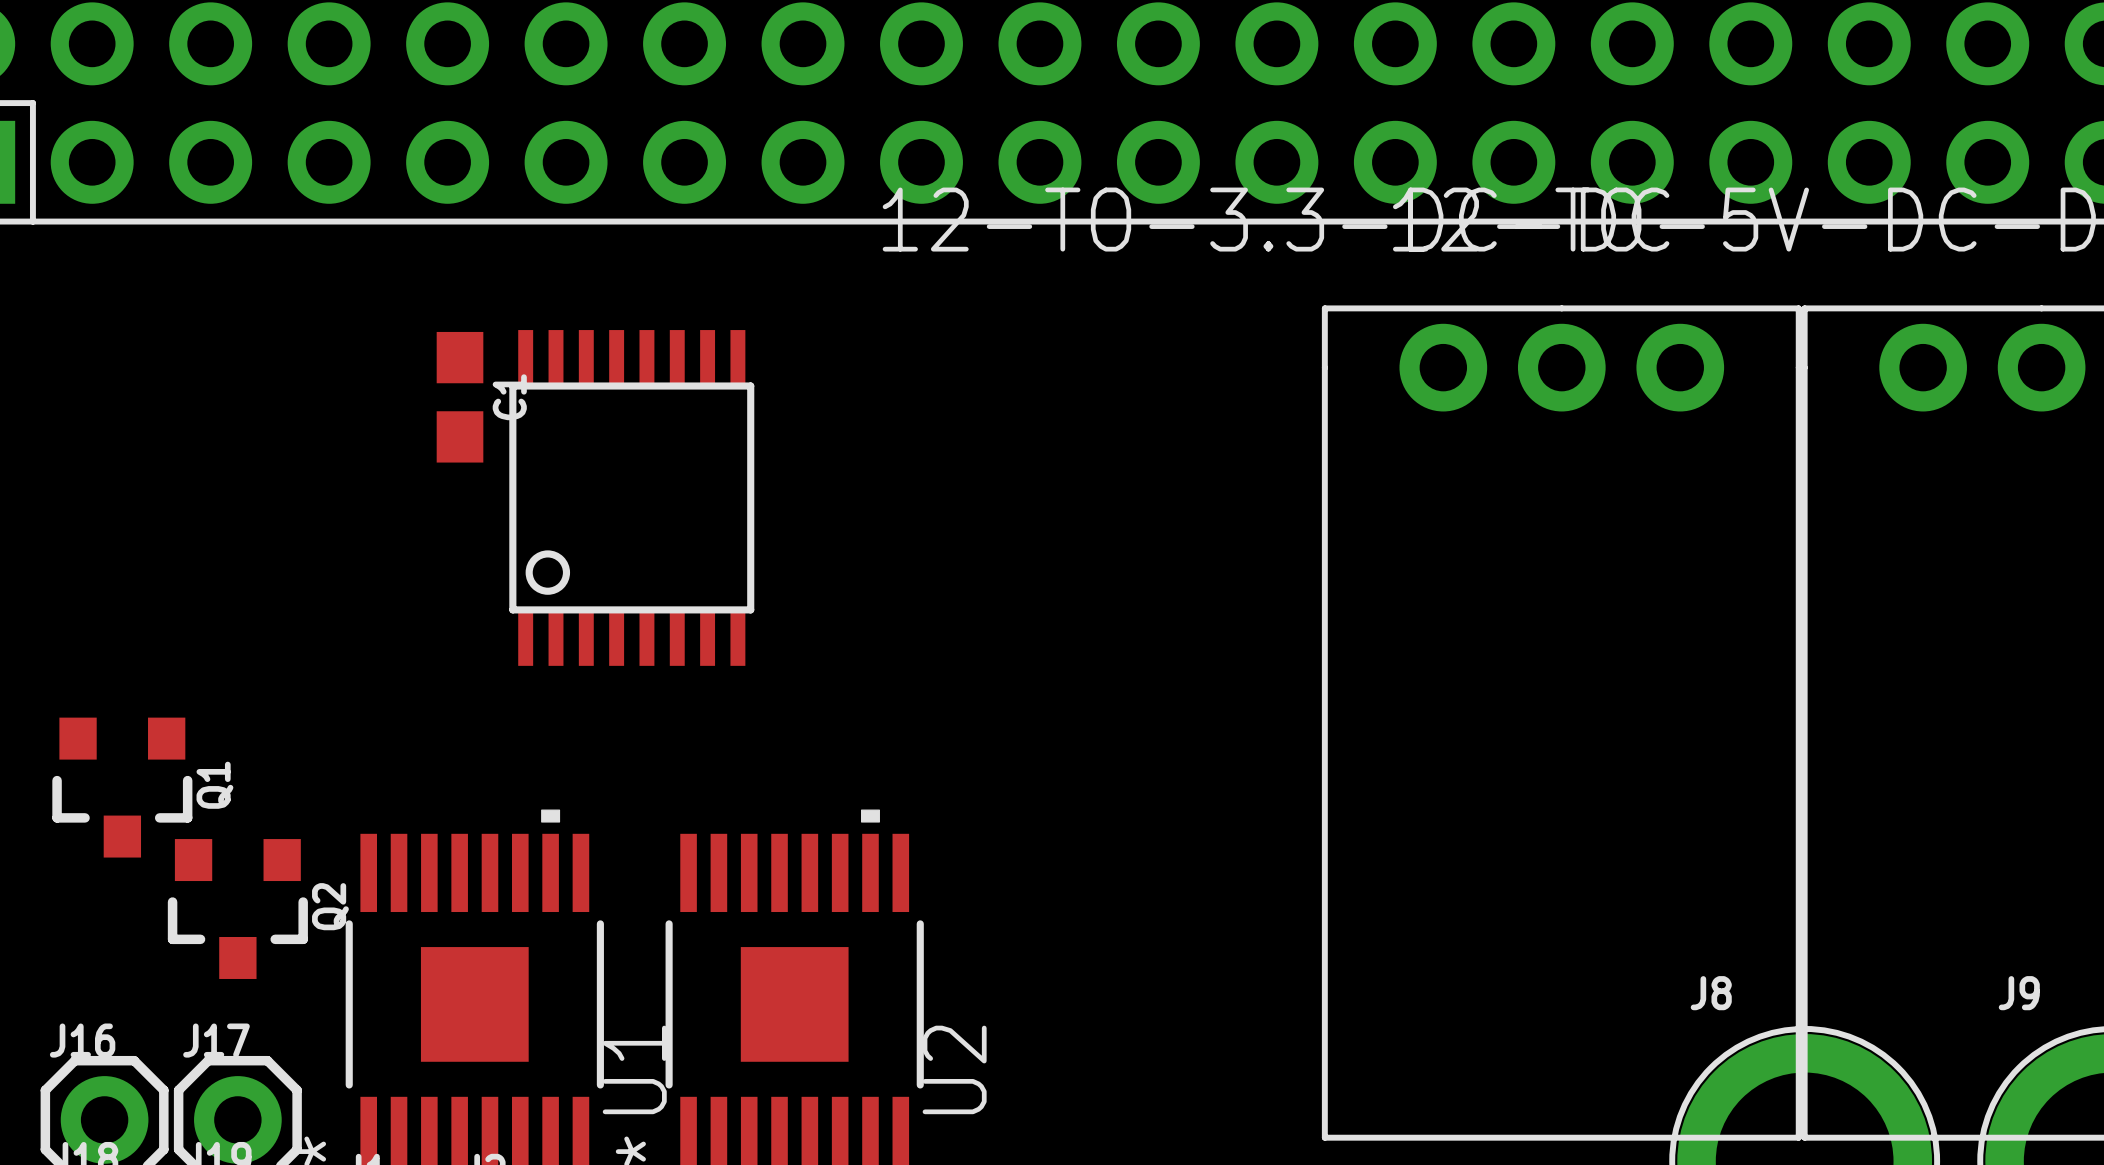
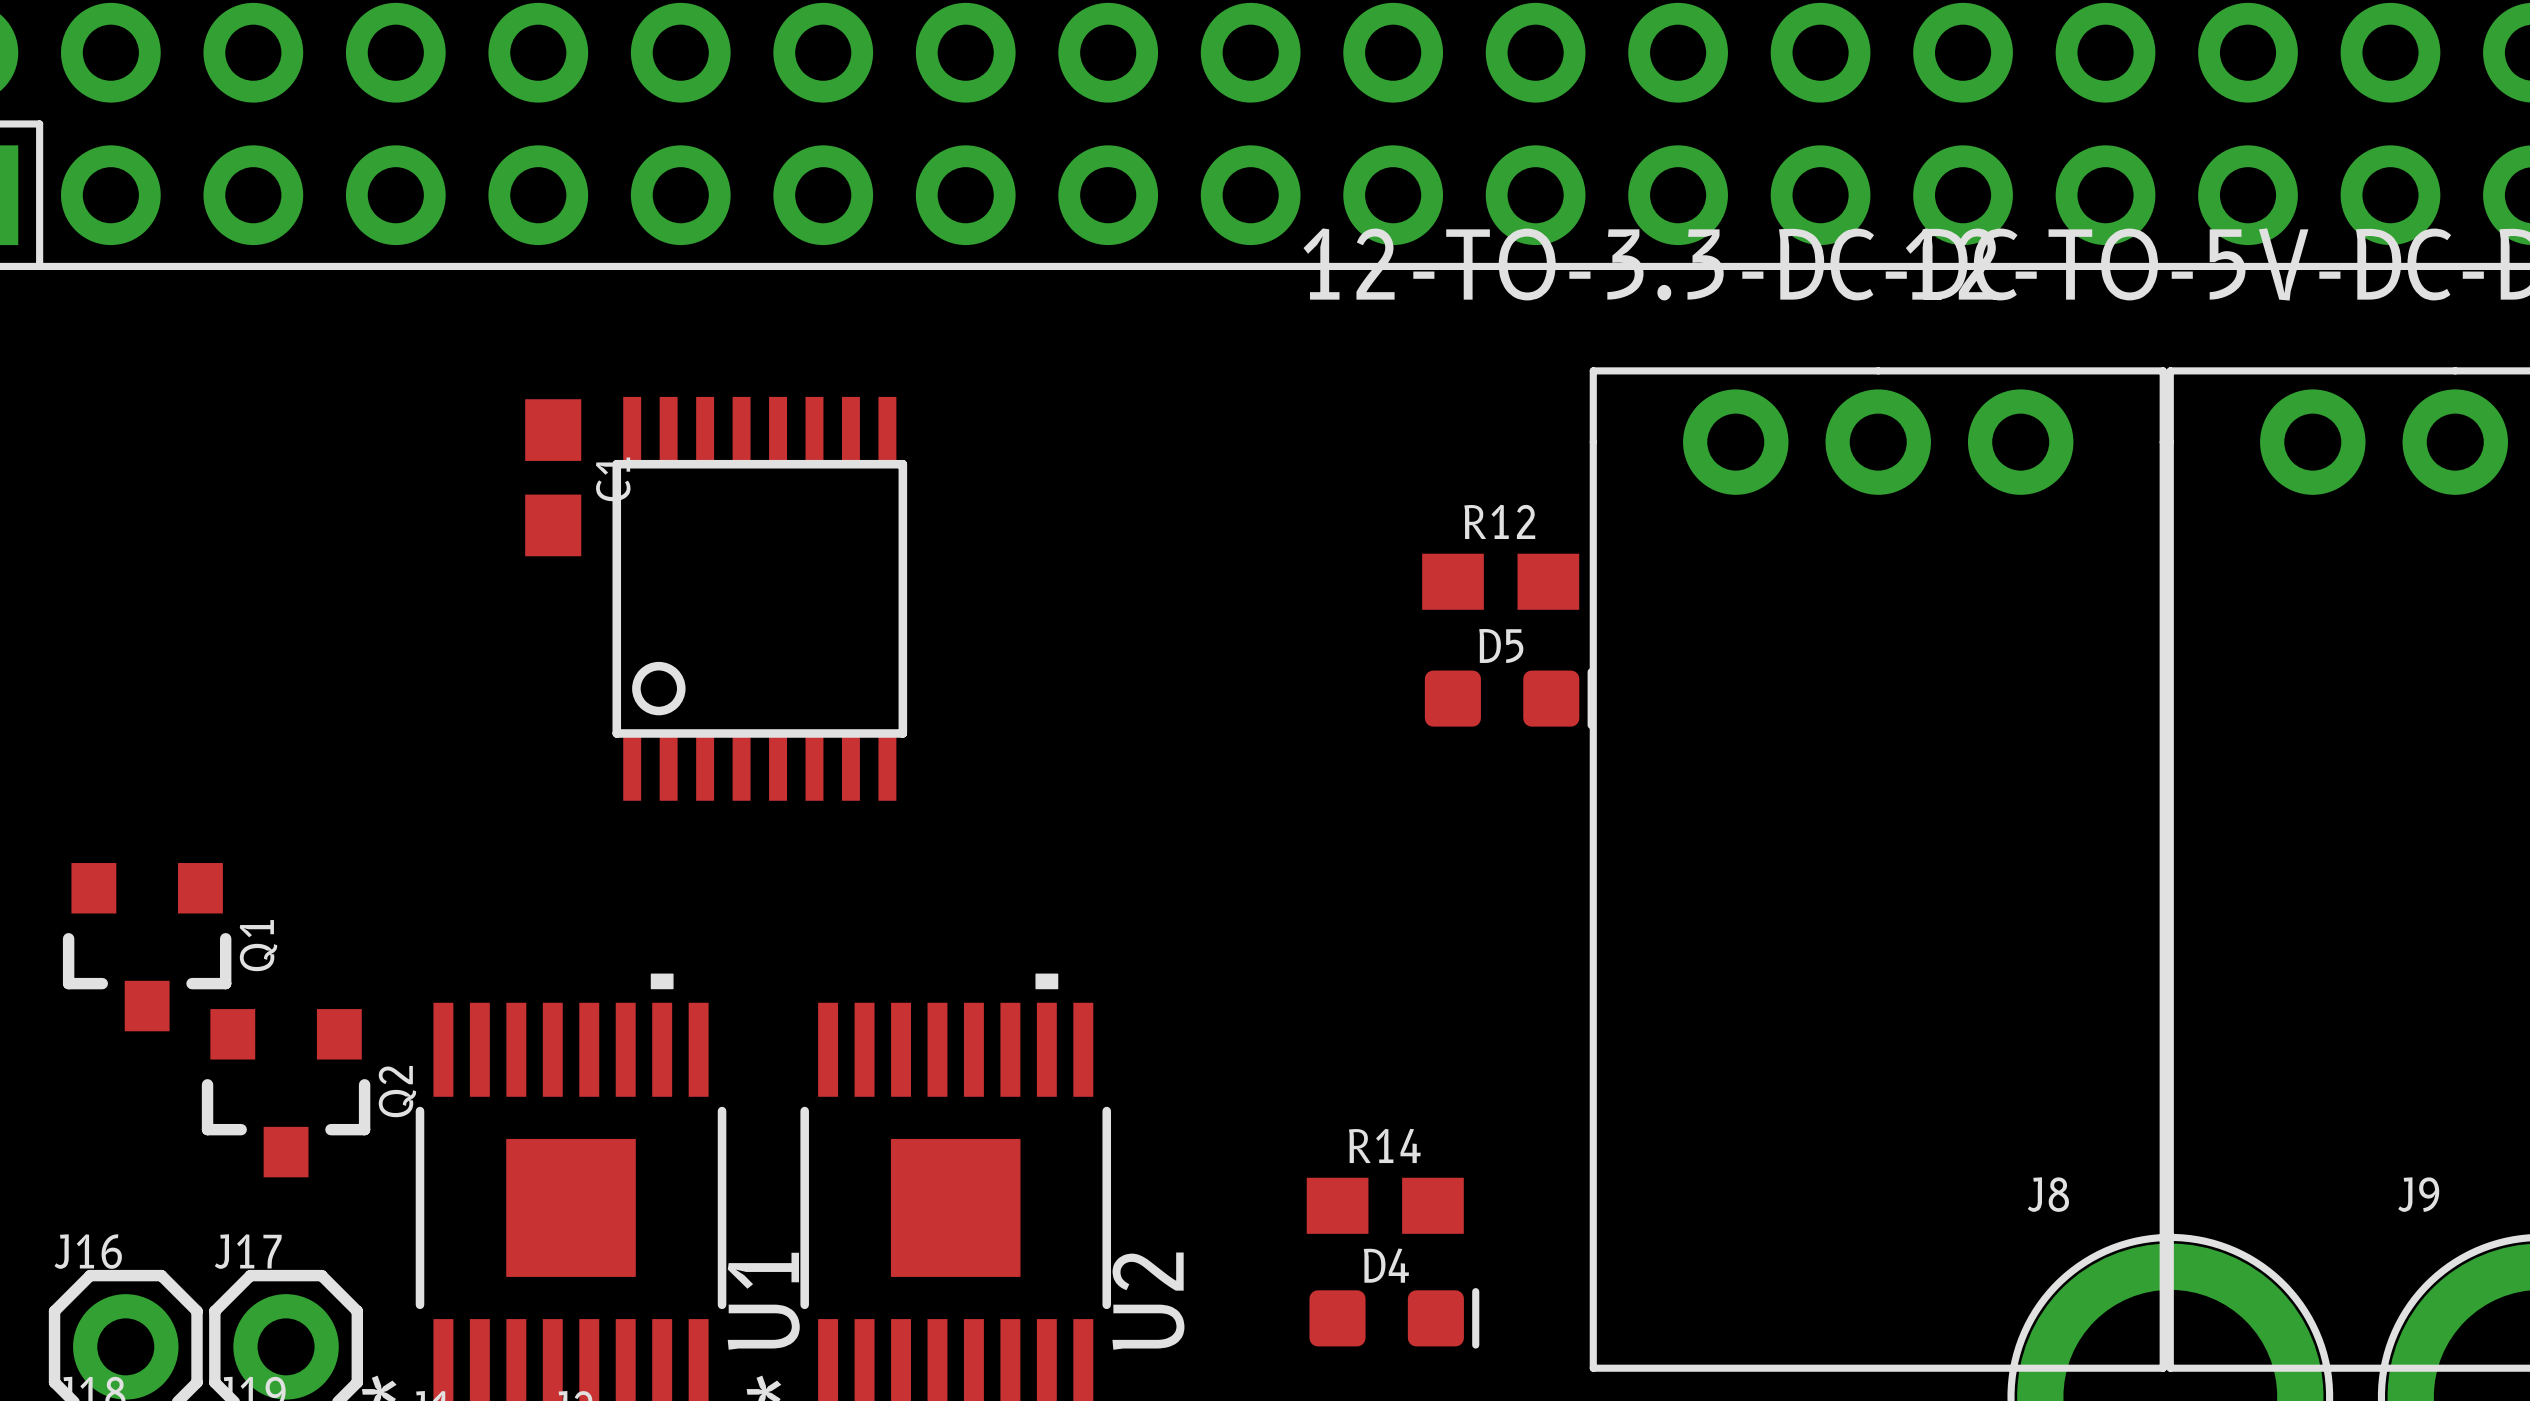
R12: none -> (1500, 581)
D5: none -> (1509, 698)
R14: none -> (1385, 1205)
D4: none -> (1394, 1318)

